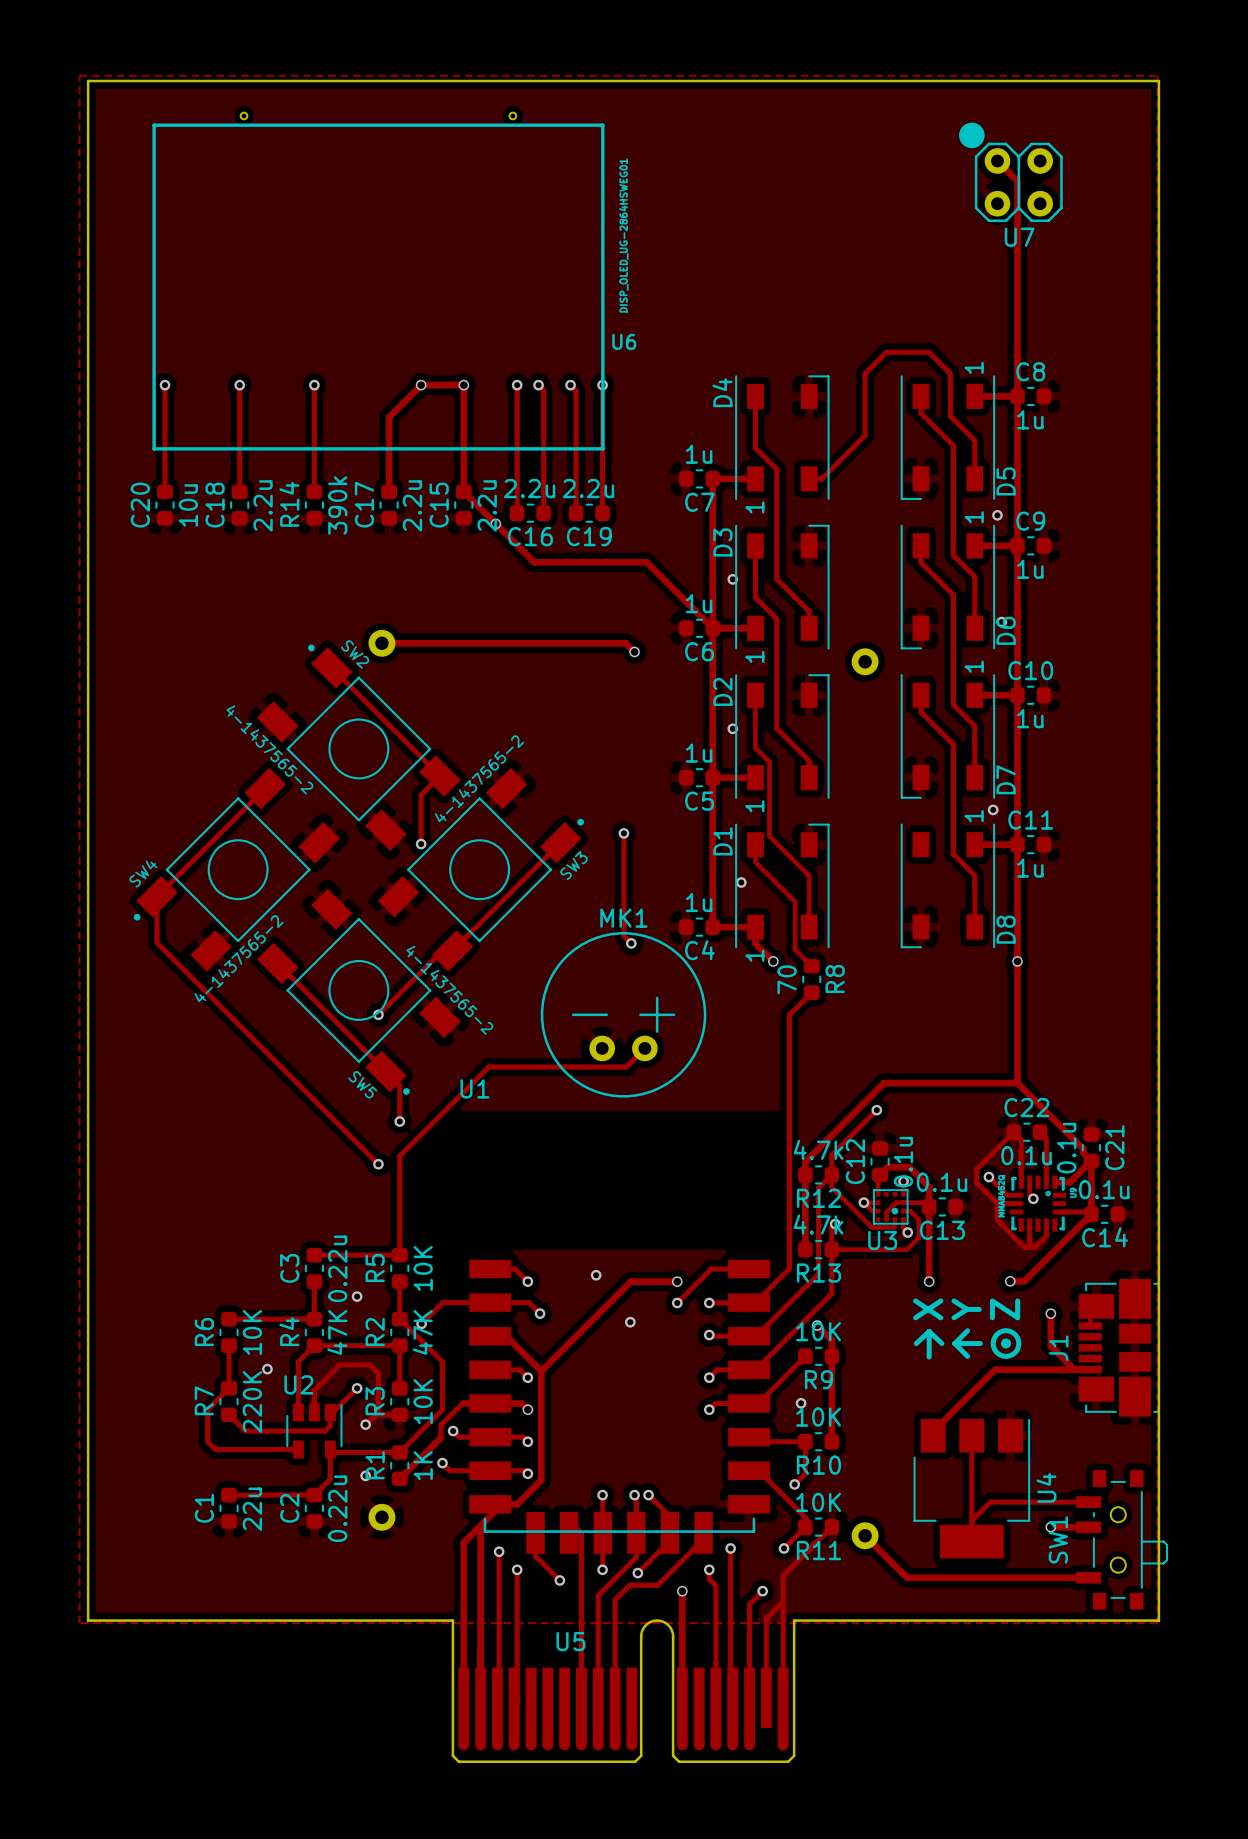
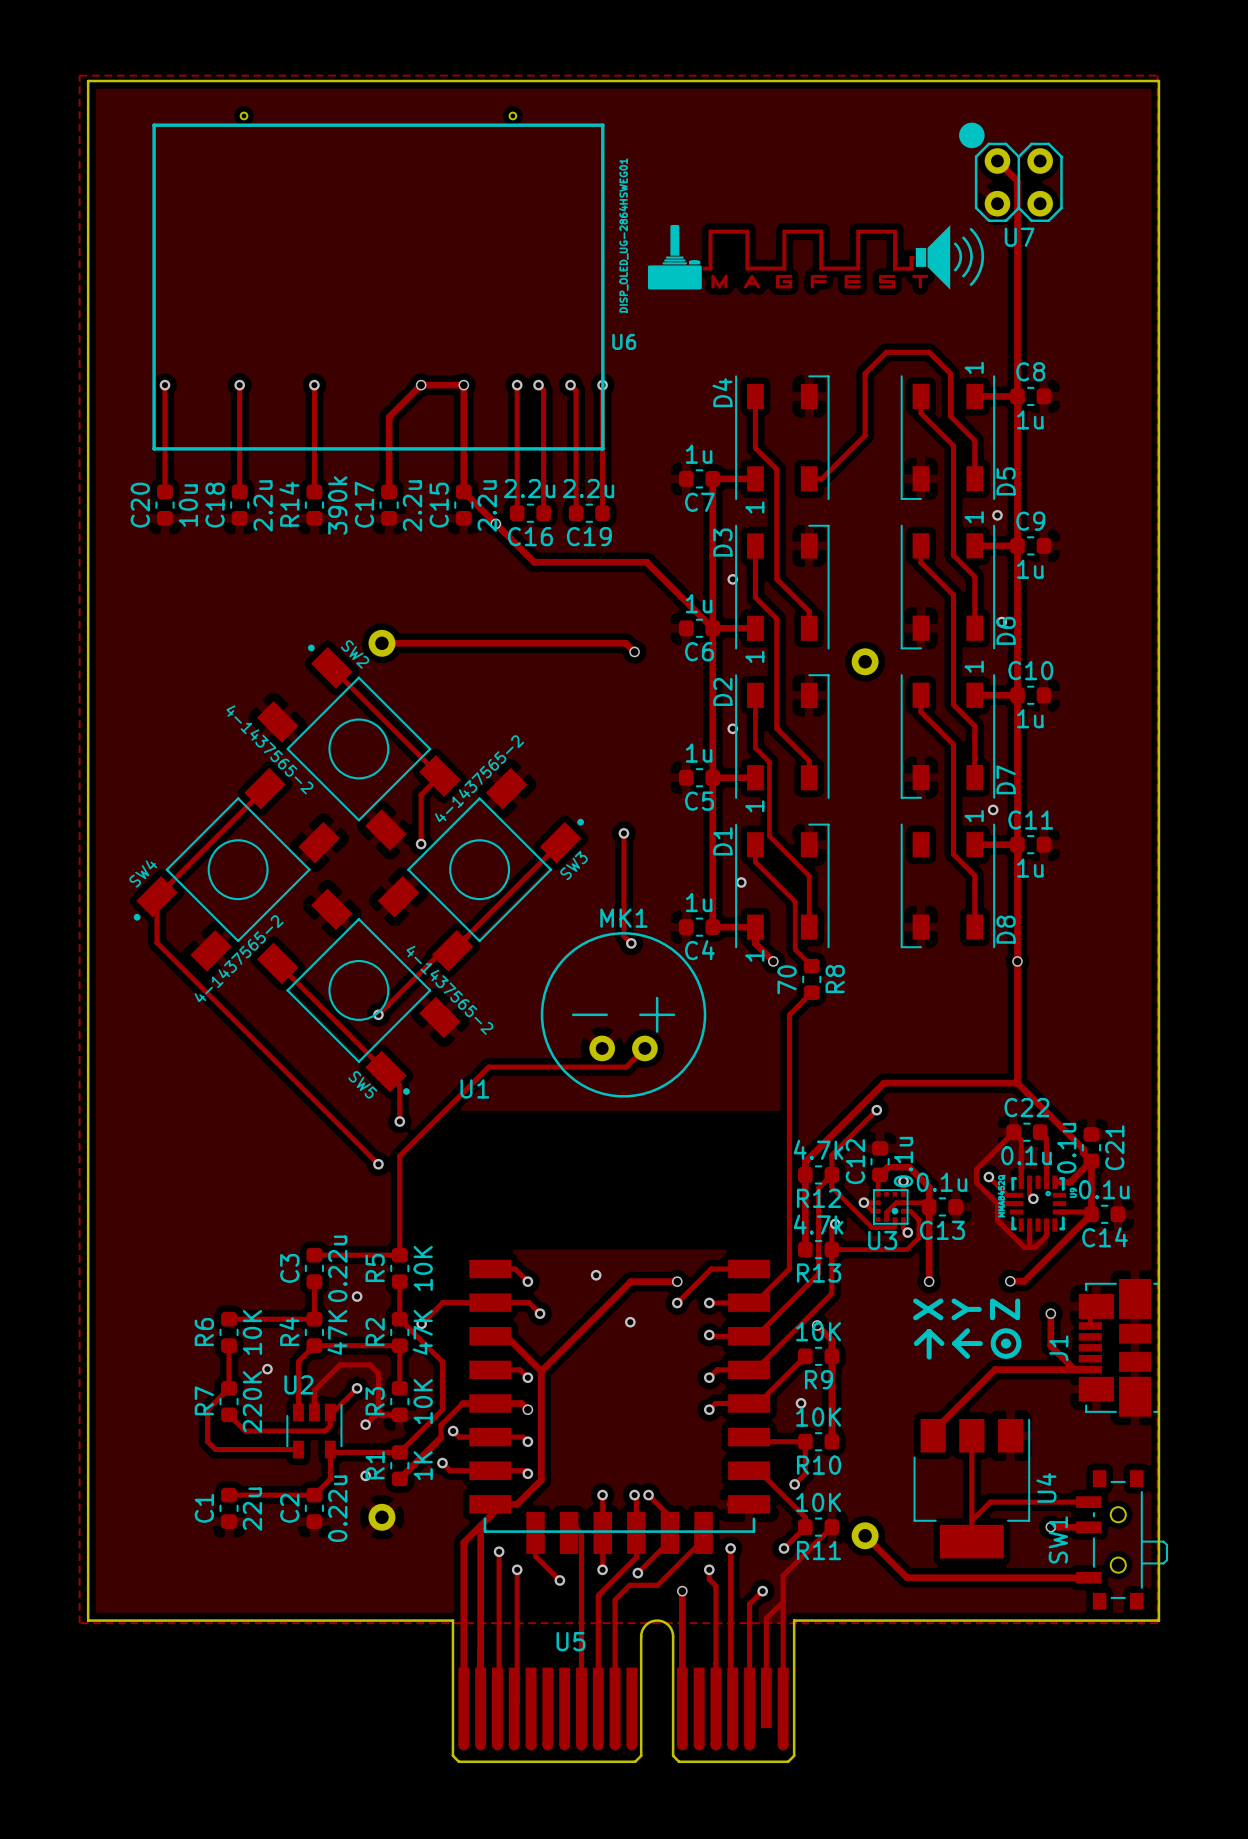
drawing: none -> [647, 224, 985, 290]

